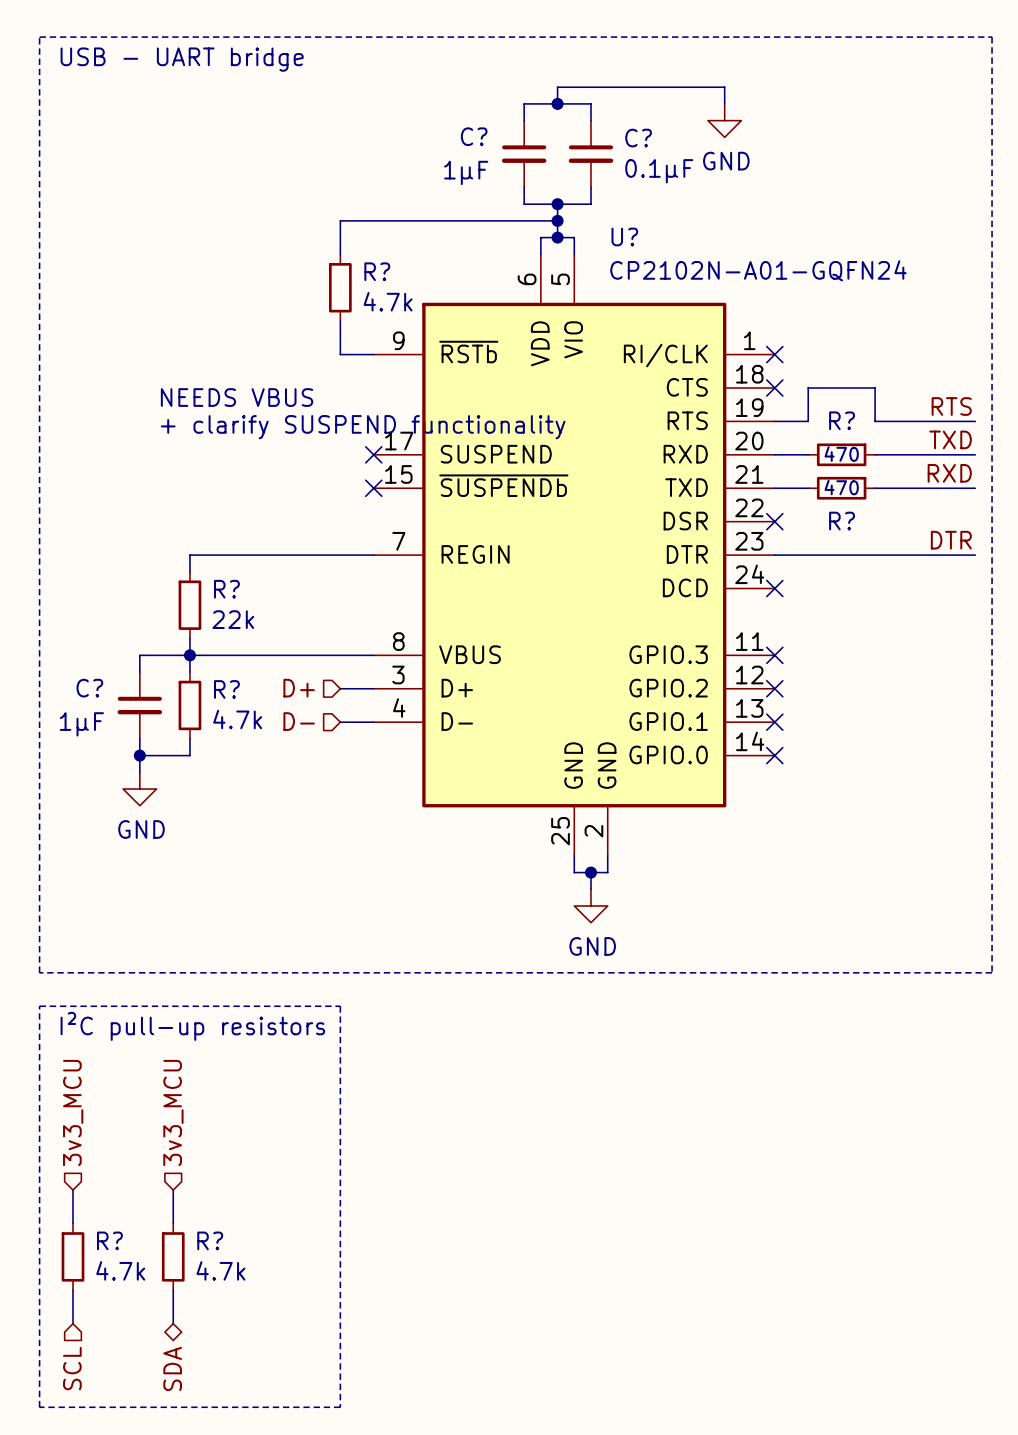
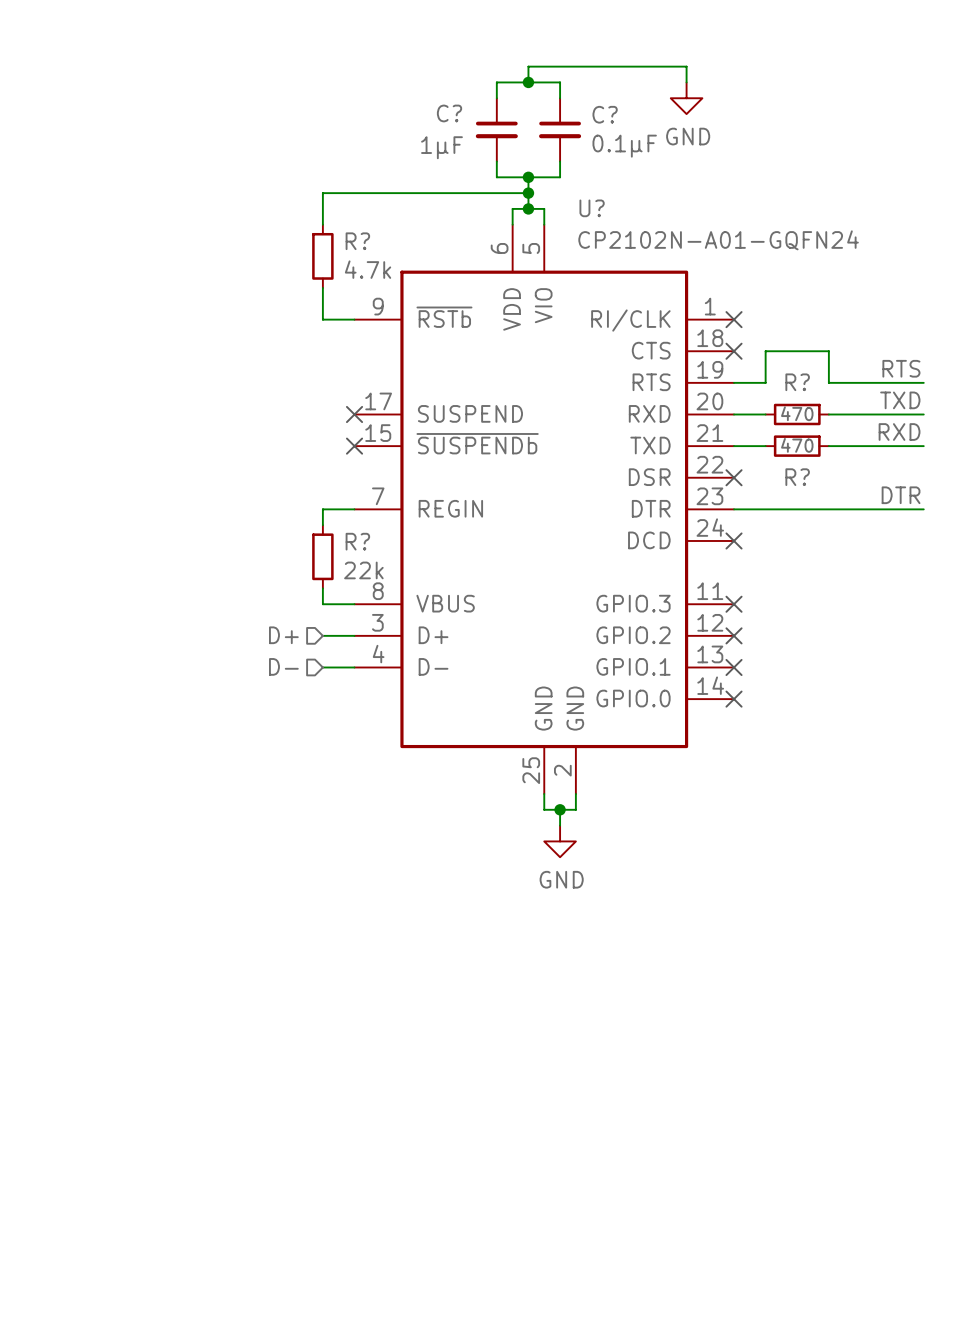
line: (39, 37) (39, 972) (992, 972) (992, 37) (39, 37) -> none
text: USB - UART bridge (182, 59) -> none
text: NEEDS VBUS (237, 397) -> none
text: + clarify SUSPEND functionality (363, 427) -> none
wire: (340, 555) (189, 555) (189, 571) -> (322, 509) (322, 525)
R? position: (189, 605) -> (322, 556)
wire: (189, 638) (189, 672) -> none
junction: (189, 655) -> none
wire: (340, 655) (139, 655) (139, 672) -> (322, 604) (322, 588)
C?: 1µF (139, 705) -> none
R?: 4.7k (189, 705) -> none
wire: (139, 738) (139, 772) -> none
wire: (189, 738) (189, 755) (139, 755) -> none
junction: (139, 755) -> none
power symbol: GND (139, 789) -> none
line: (39, 1006) (340, 1006) (340, 1407) (39, 1407) (39, 1006) -> none
text: I²C pull-up resistors (192, 1026) -> none
hierarchical label: 3v3_MCU (73, 1113) -> none
hierarchical label: 3v3_MCU (173, 1113) -> none
wire: (73, 1190) (73, 1223) -> none
wire: (173, 1190) (173, 1223) -> none
R?: 4.7k (73, 1256) -> none
R?: 4.7k (173, 1256) -> none
wire: (73, 1290) (73, 1323) -> none
wire: (173, 1290) (173, 1323) -> none
hierarchical label: SCL (72, 1368) -> none
hierarchical label: SDA (172, 1368) -> none

